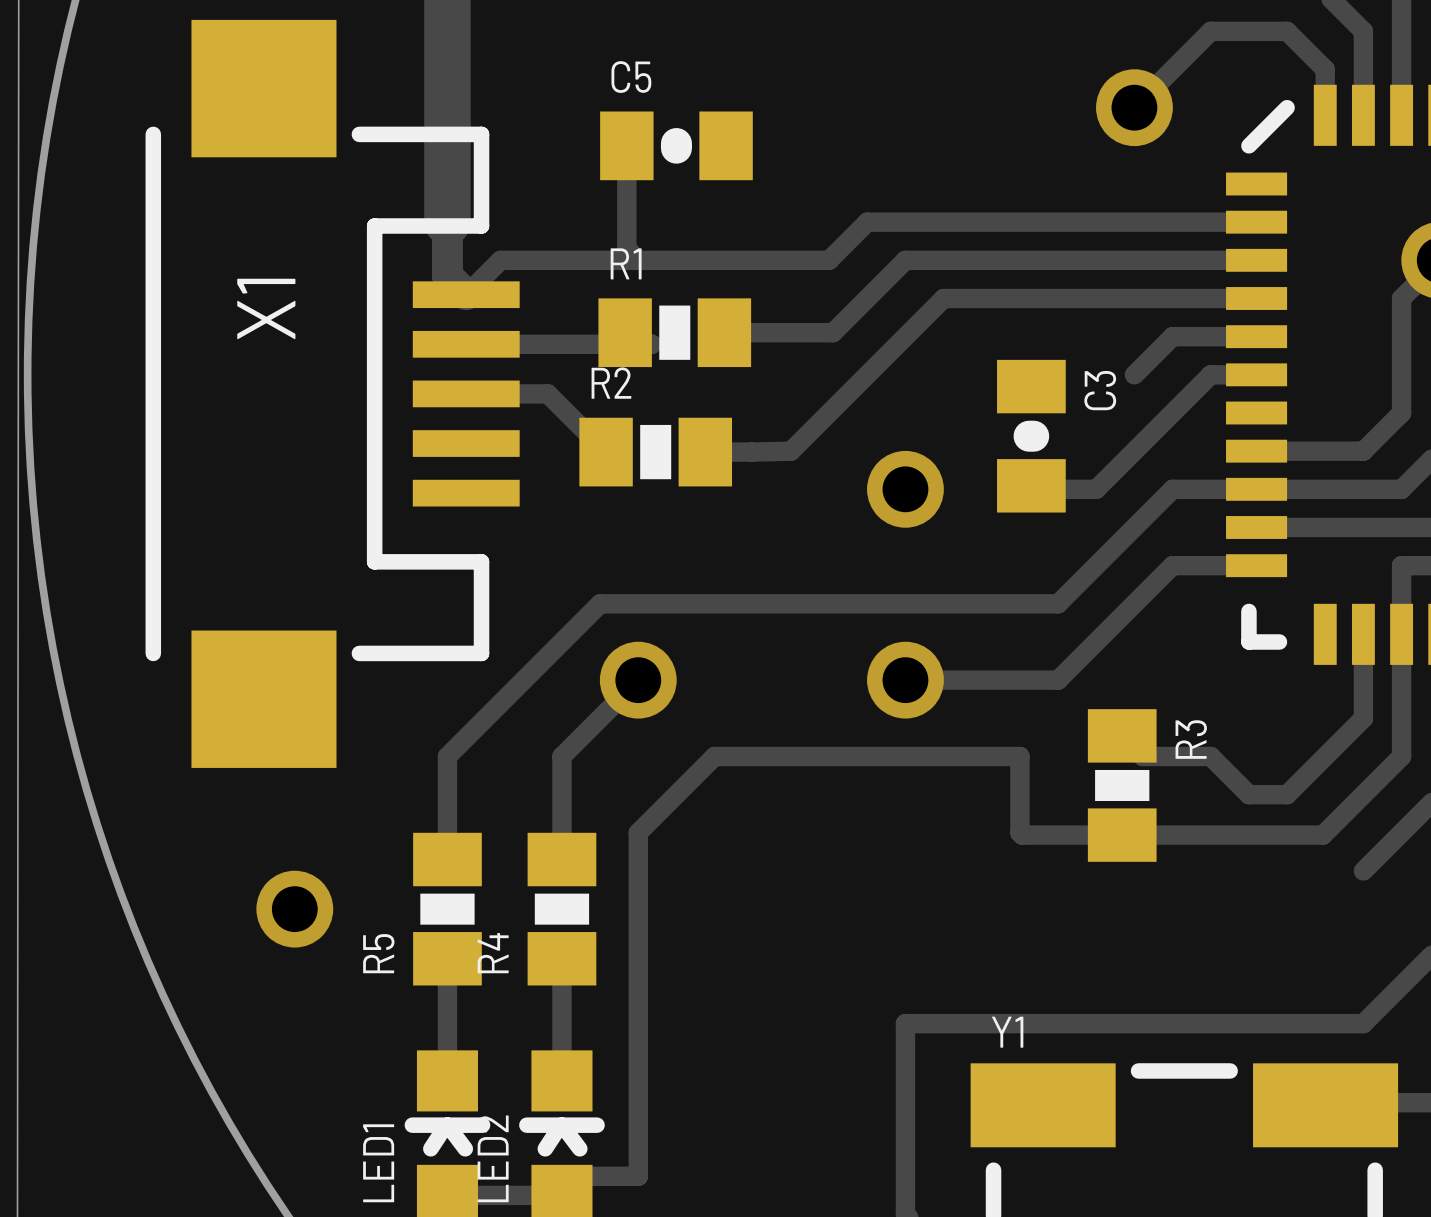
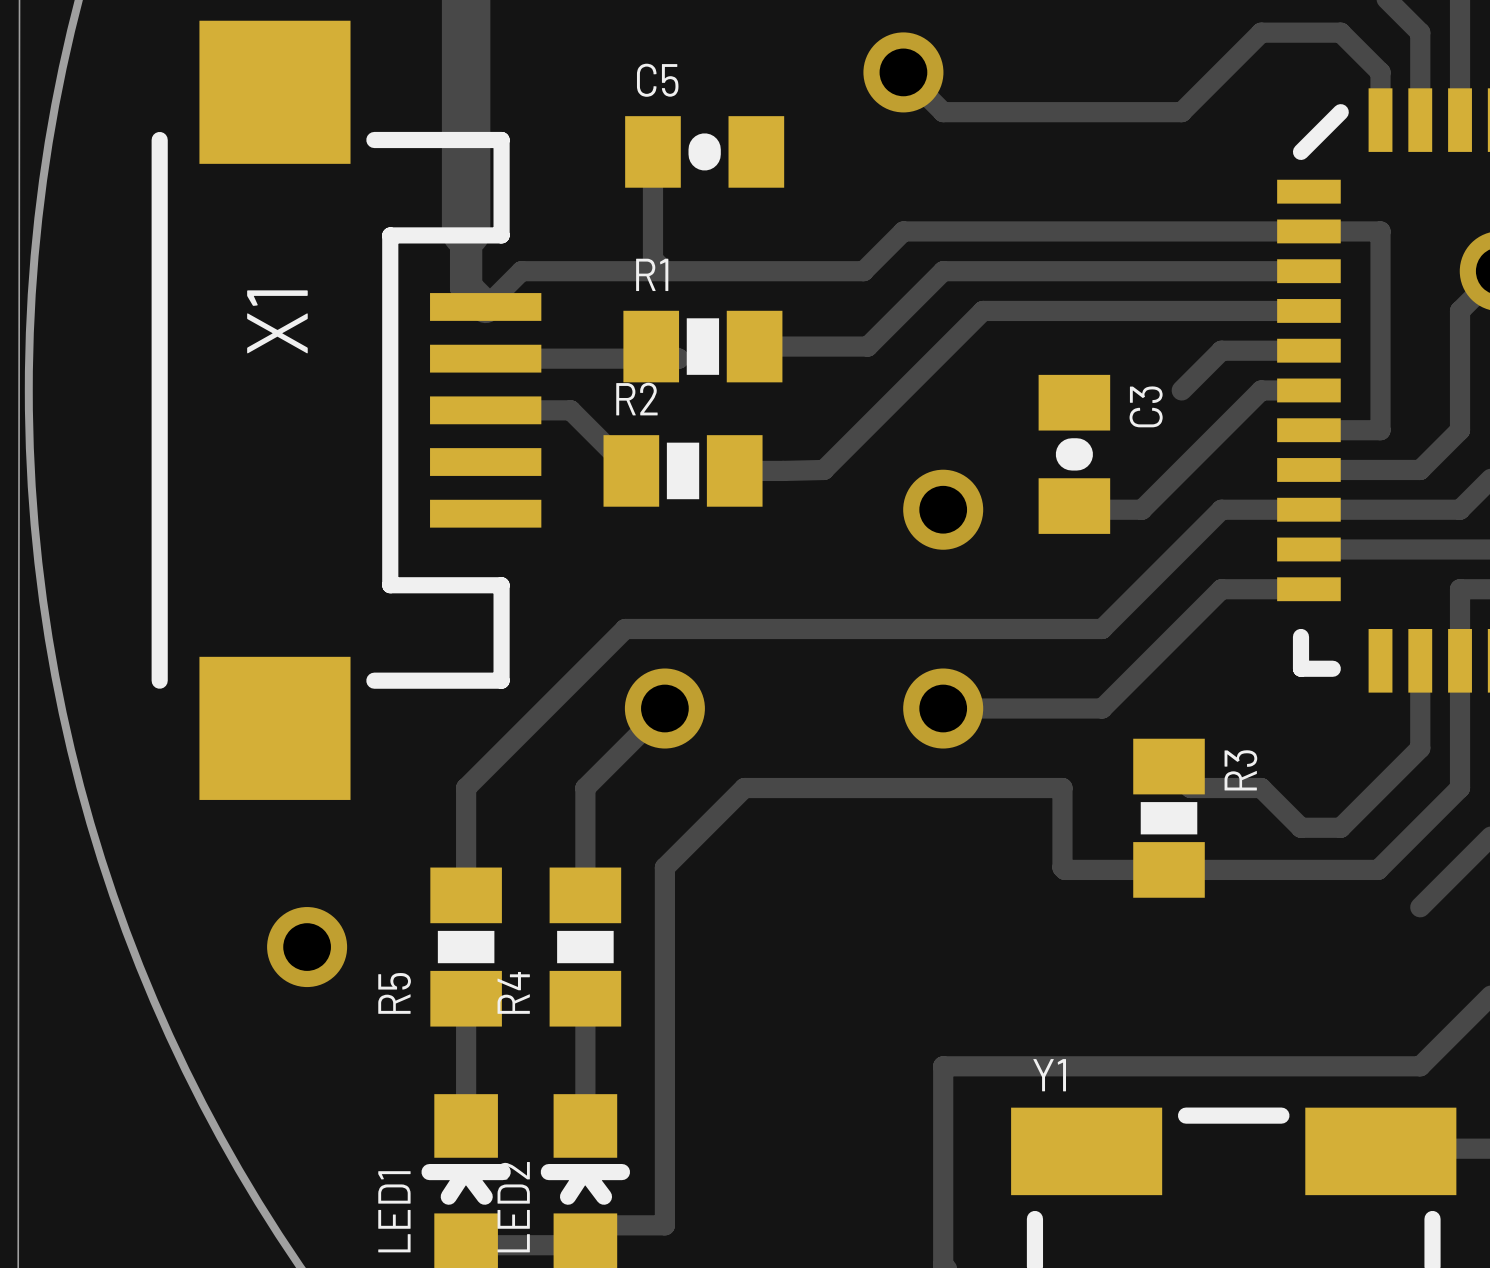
track: none -> (903, 72) (943, 112) (1181, 112)
via position: (1134, 107) -> (903, 72)
track: none -> (1308, 231) (1380, 231) (1380, 430) (1308, 430)

